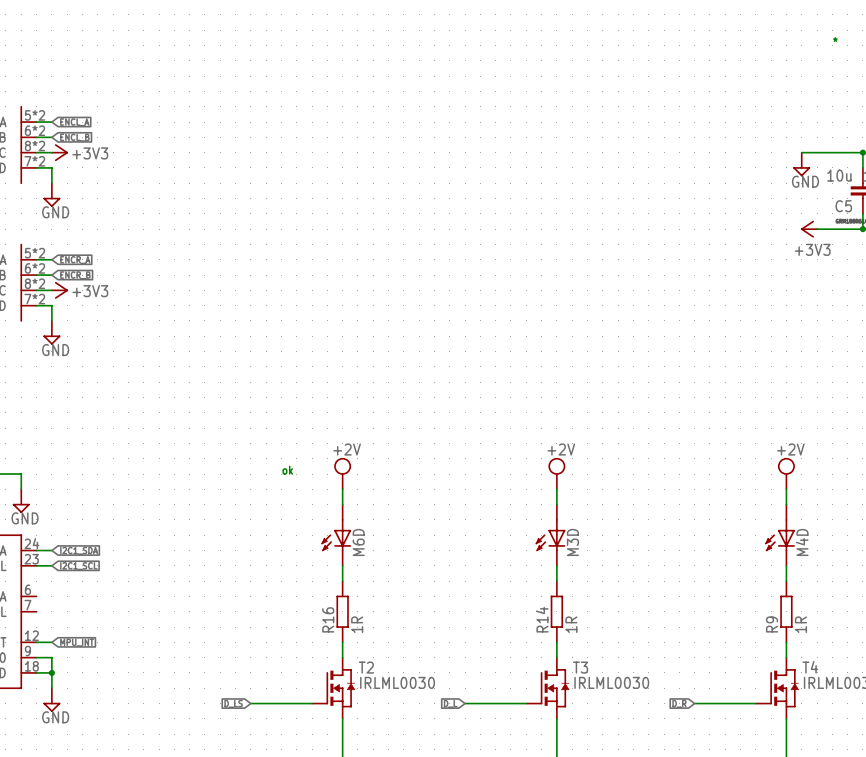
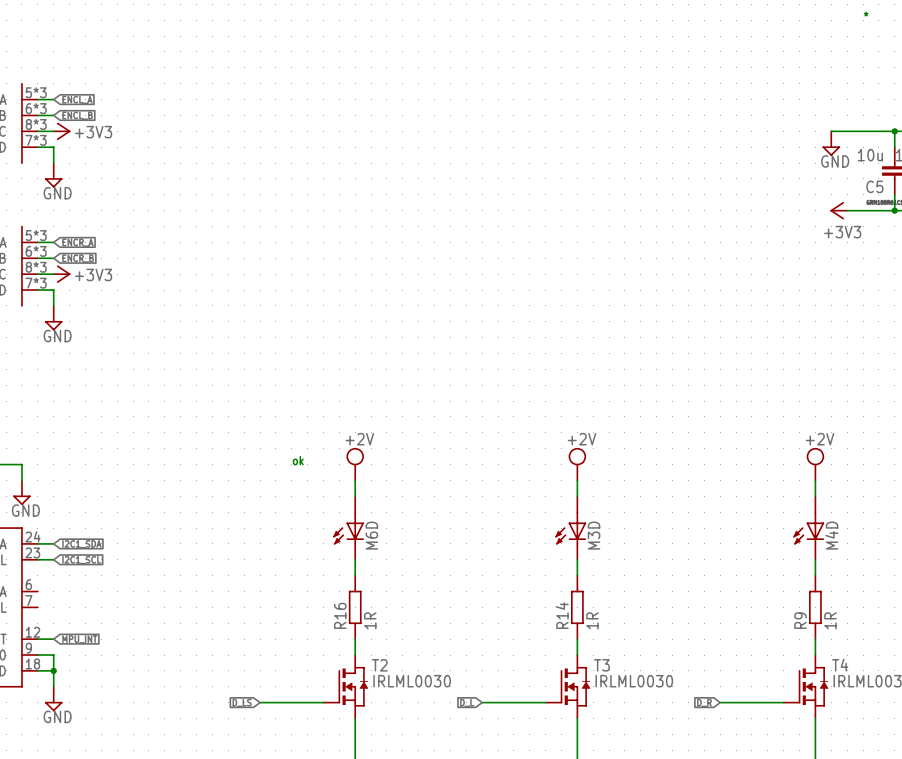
part pin number: 5*2 (35, 115) -> 5*3 (36, 92)
part pin number: 6*2 (35, 130) -> 6*3 (36, 108)
part pin number: 8*2 (35, 146) -> 8*3 (36, 124)
part pin number: 7*2 (34, 161) -> 7*3 (36, 140)
part pin number: 5*2 (35, 253) -> 5*3 (36, 235)
part pin number: 6*2 (35, 268) -> 6*3 (36, 251)
part pin number: 8*2 (35, 283) -> 8*3 (36, 267)
part pin number: 7*2 (34, 299) -> 7*3 (36, 283)

